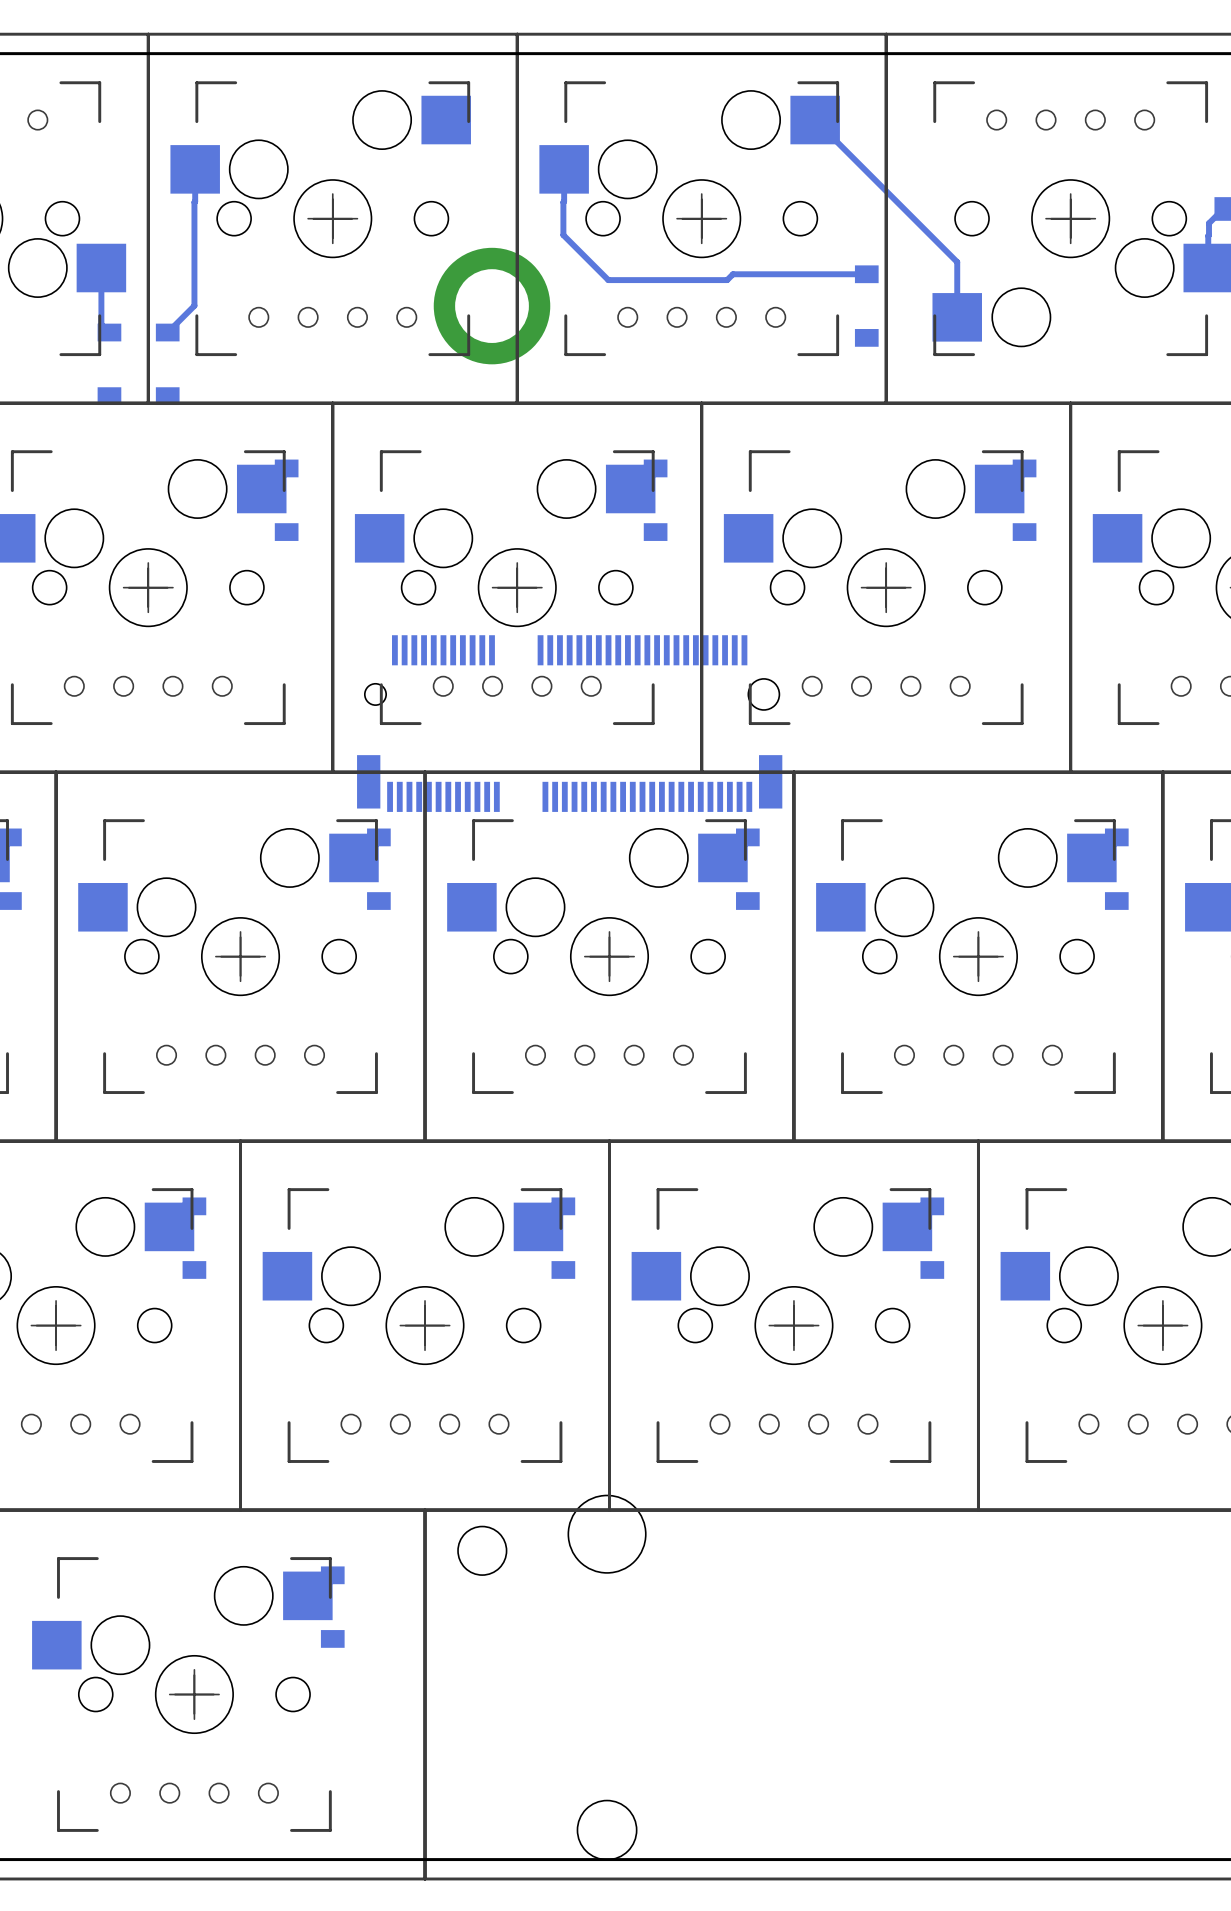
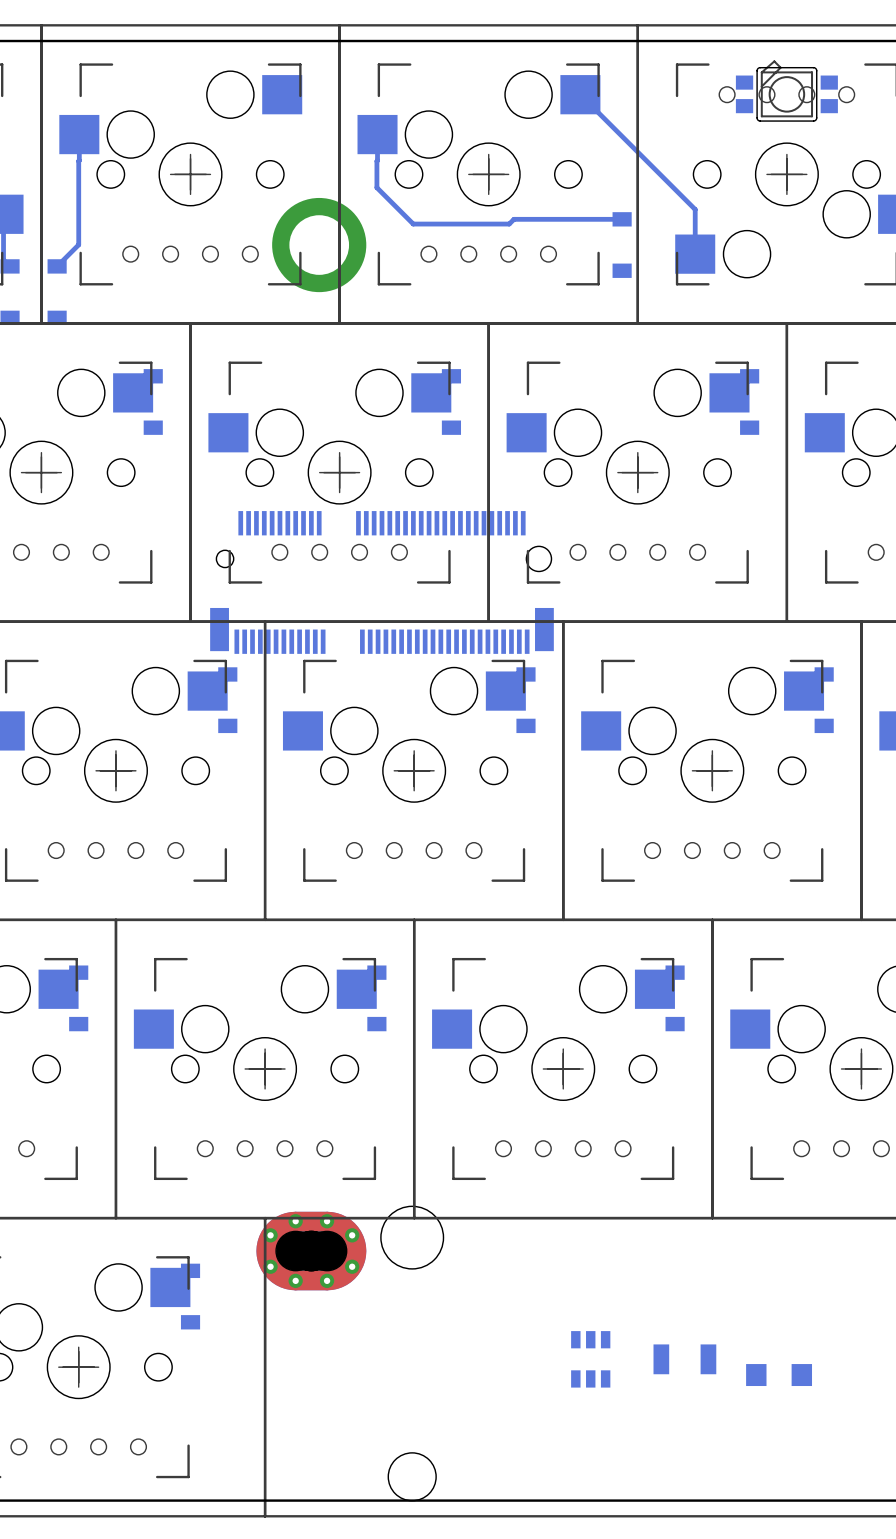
part: none -> (786, 90)
part: none -> (311, 1251)
part: none -> (590, 1359)
part: none -> (684, 1359)
part: none -> (779, 1375)

